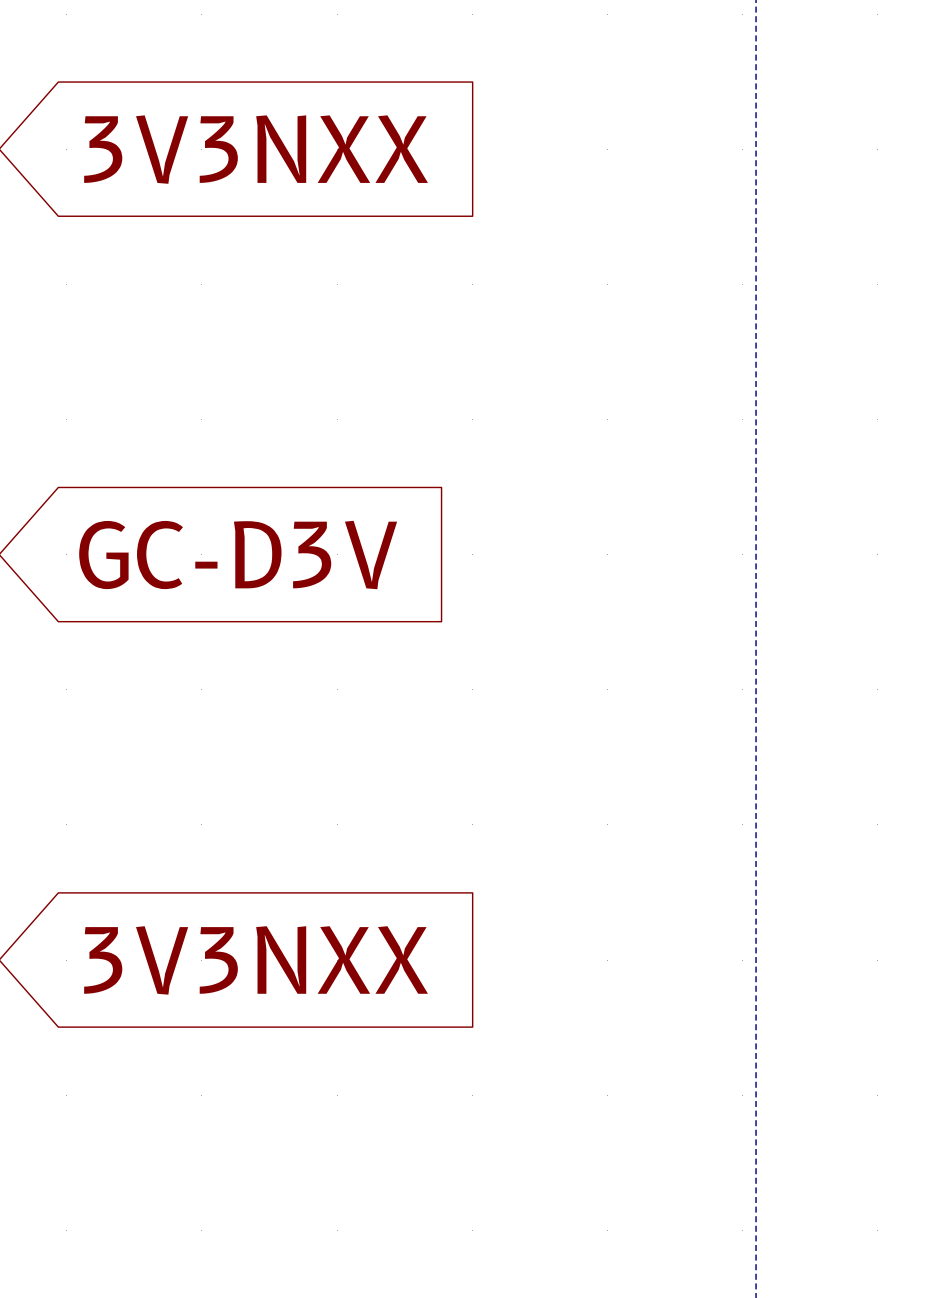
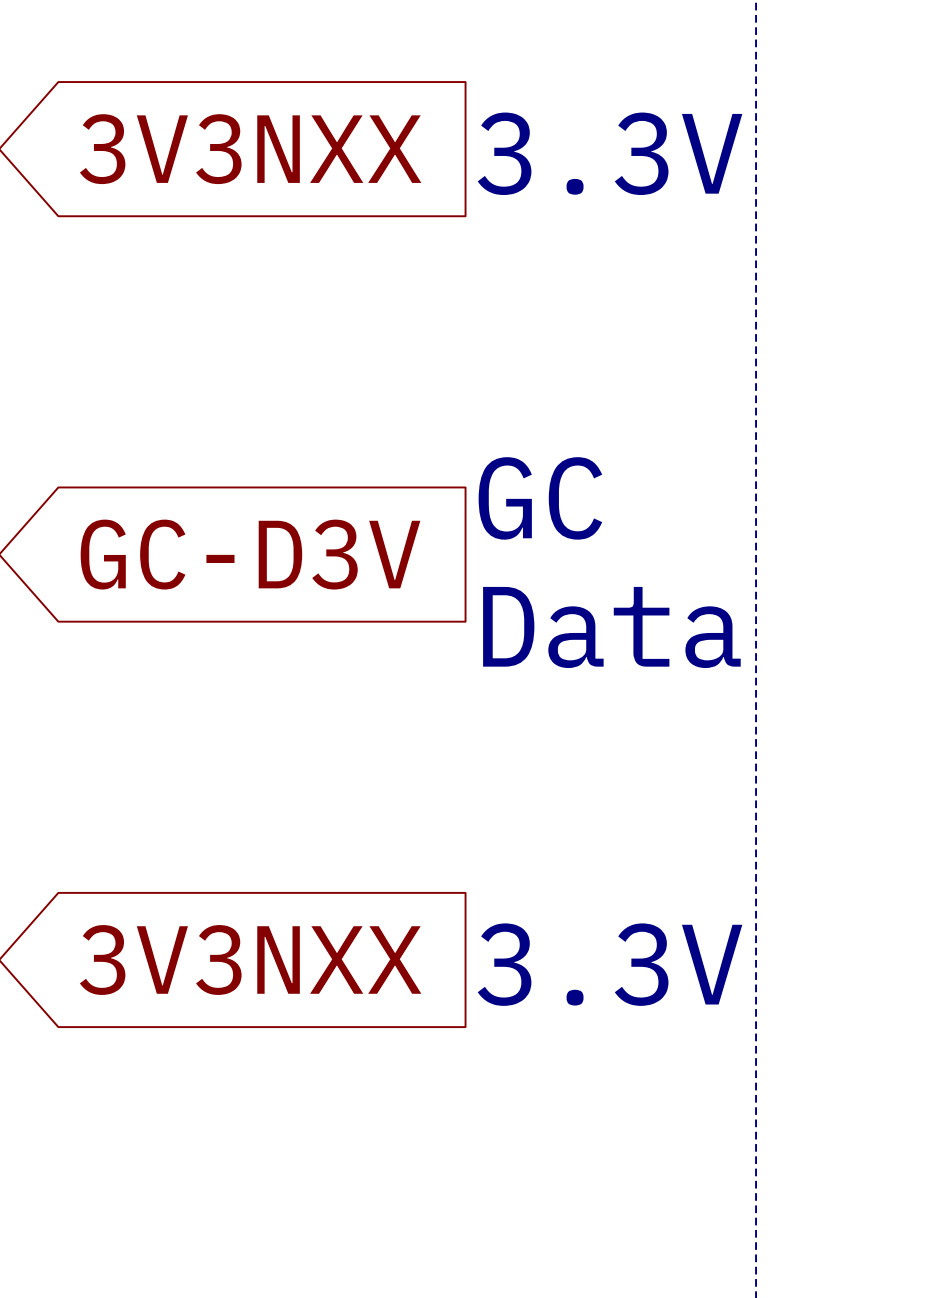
text: none -> 3.3V (610, 153)
text: none -> GC (540, 498)
text: none -> Data (611, 627)
text: none -> 3.3V (610, 964)

